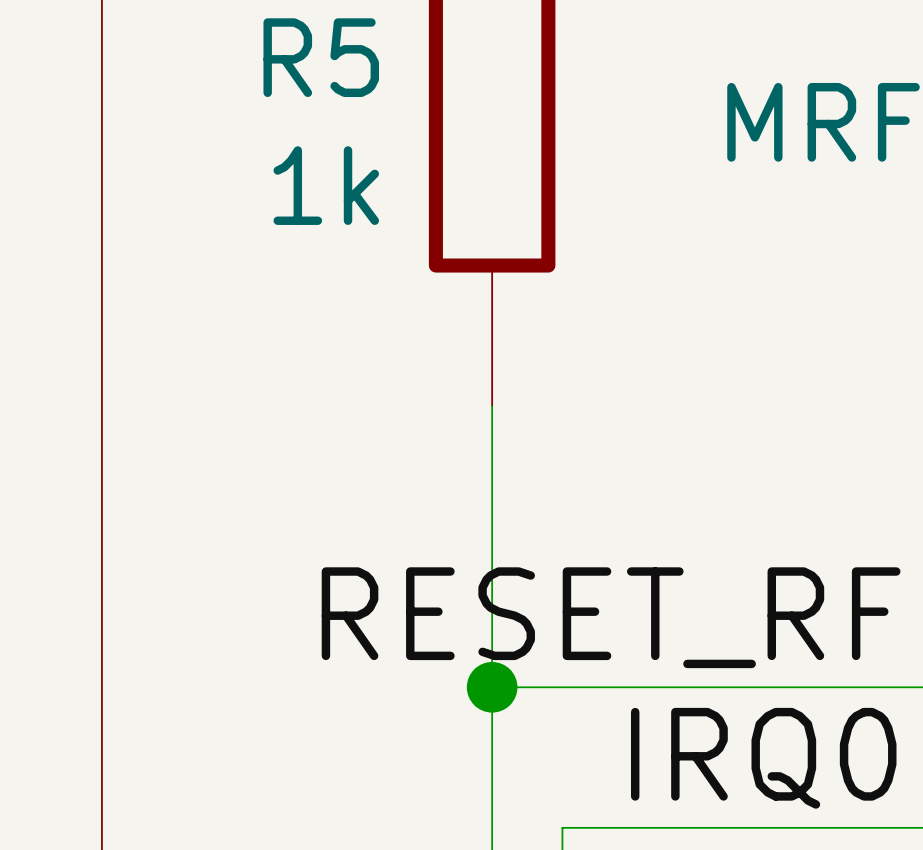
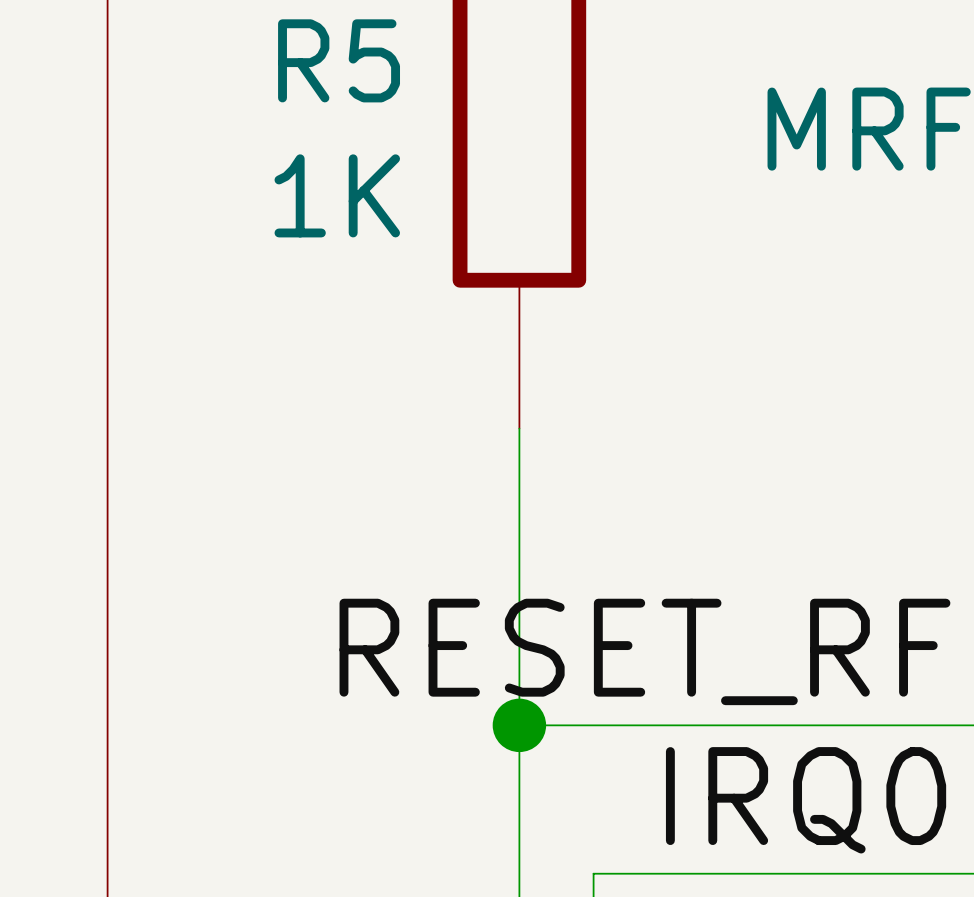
R5 value: 1k (326, 185) -> 1K (337, 195)

